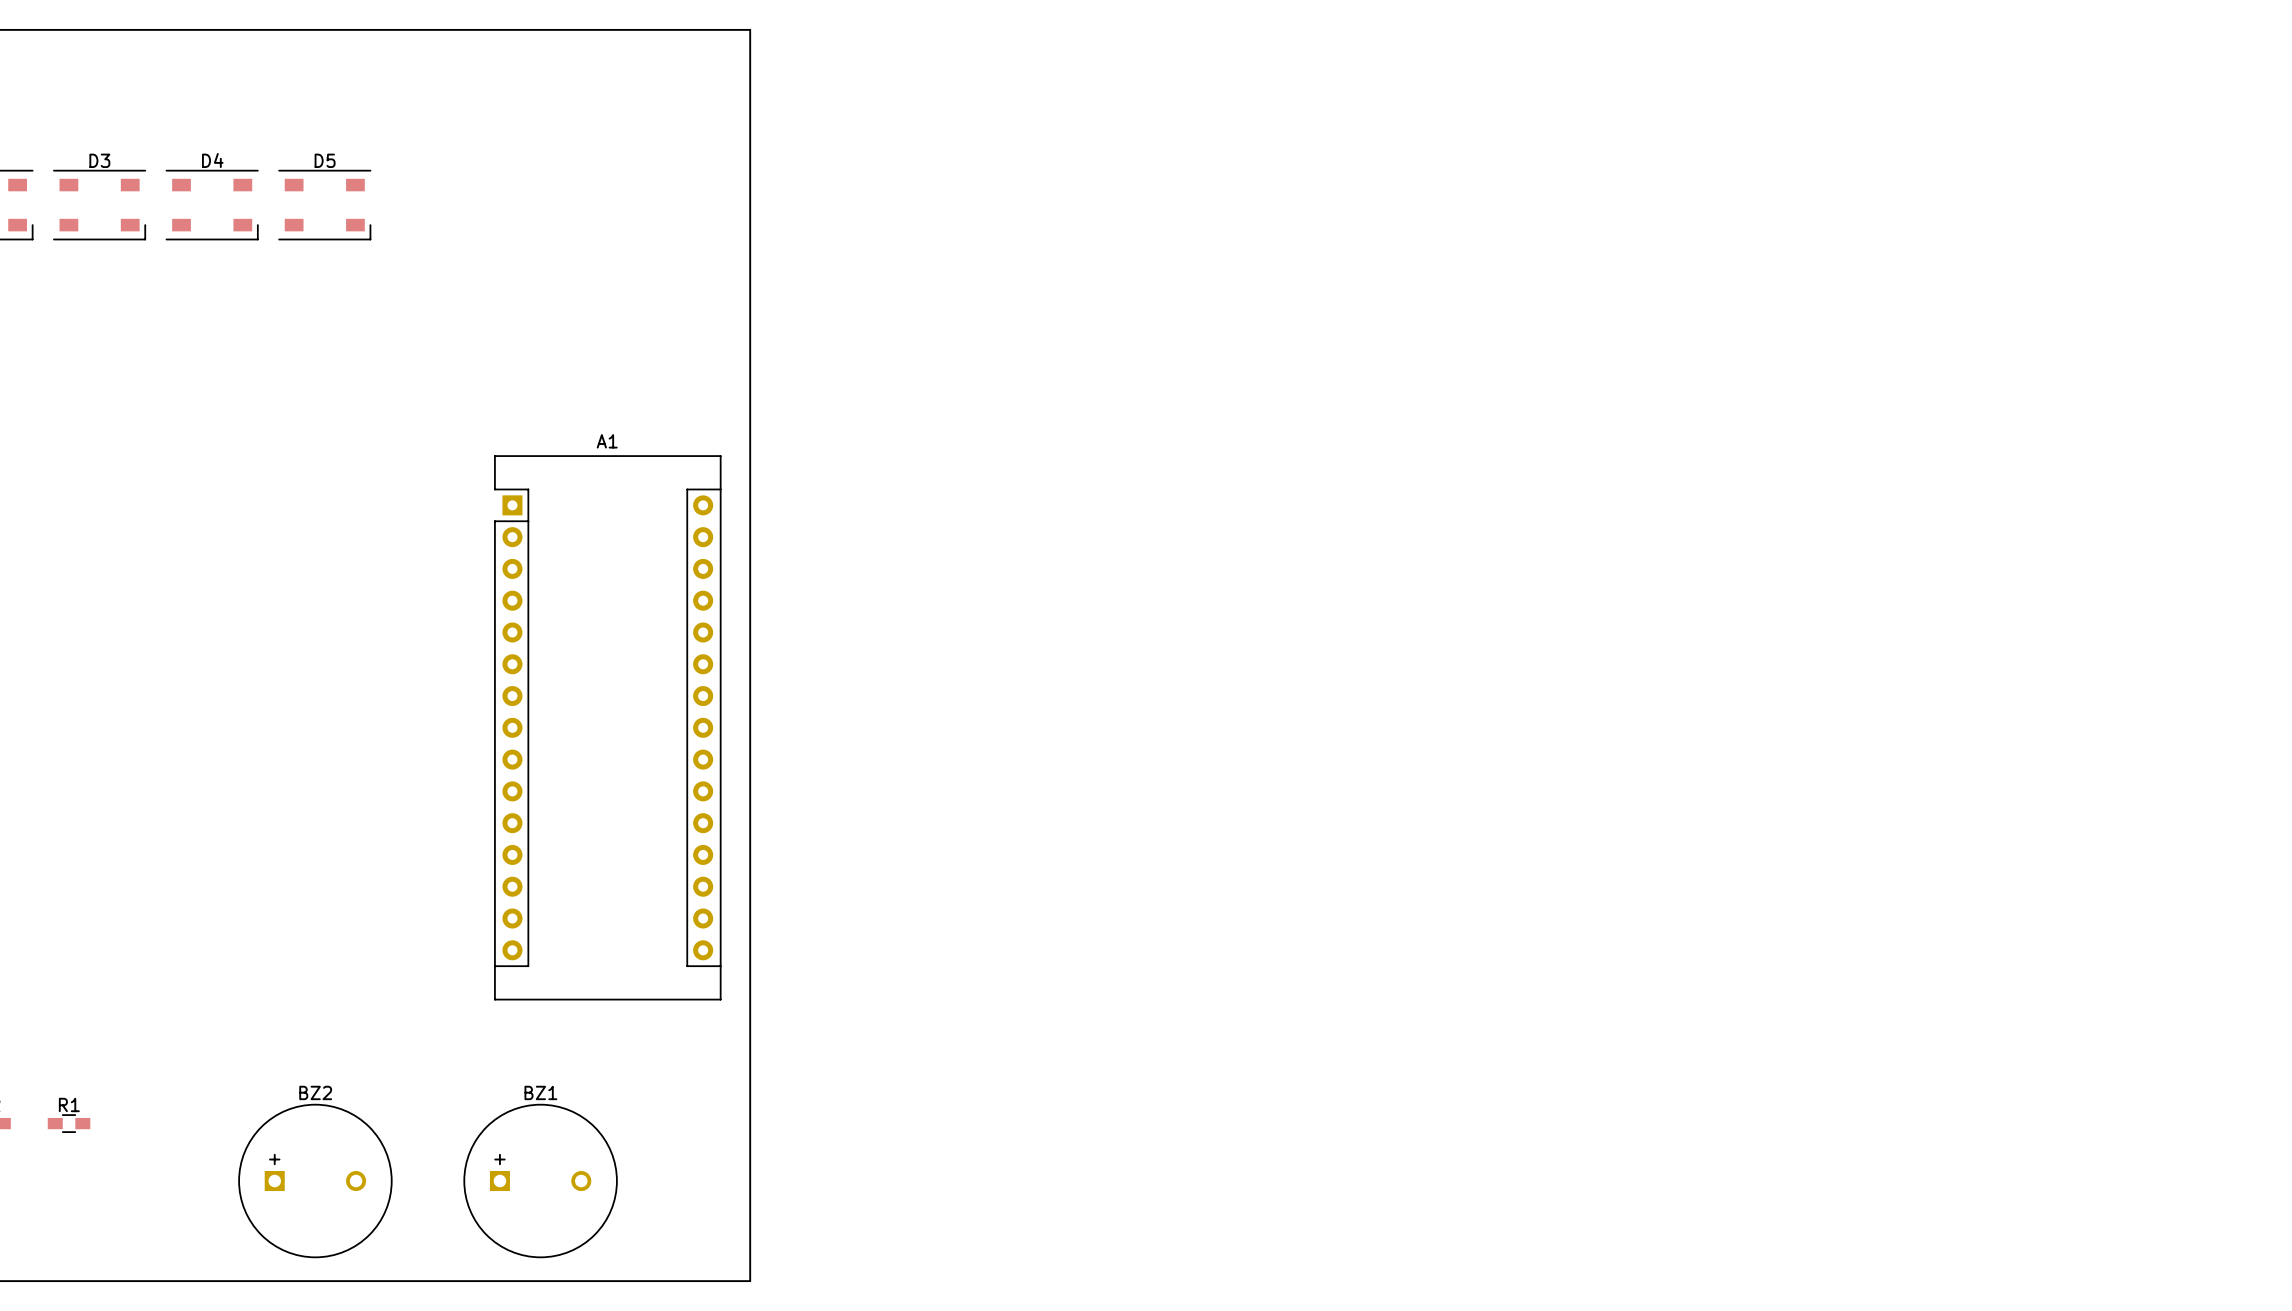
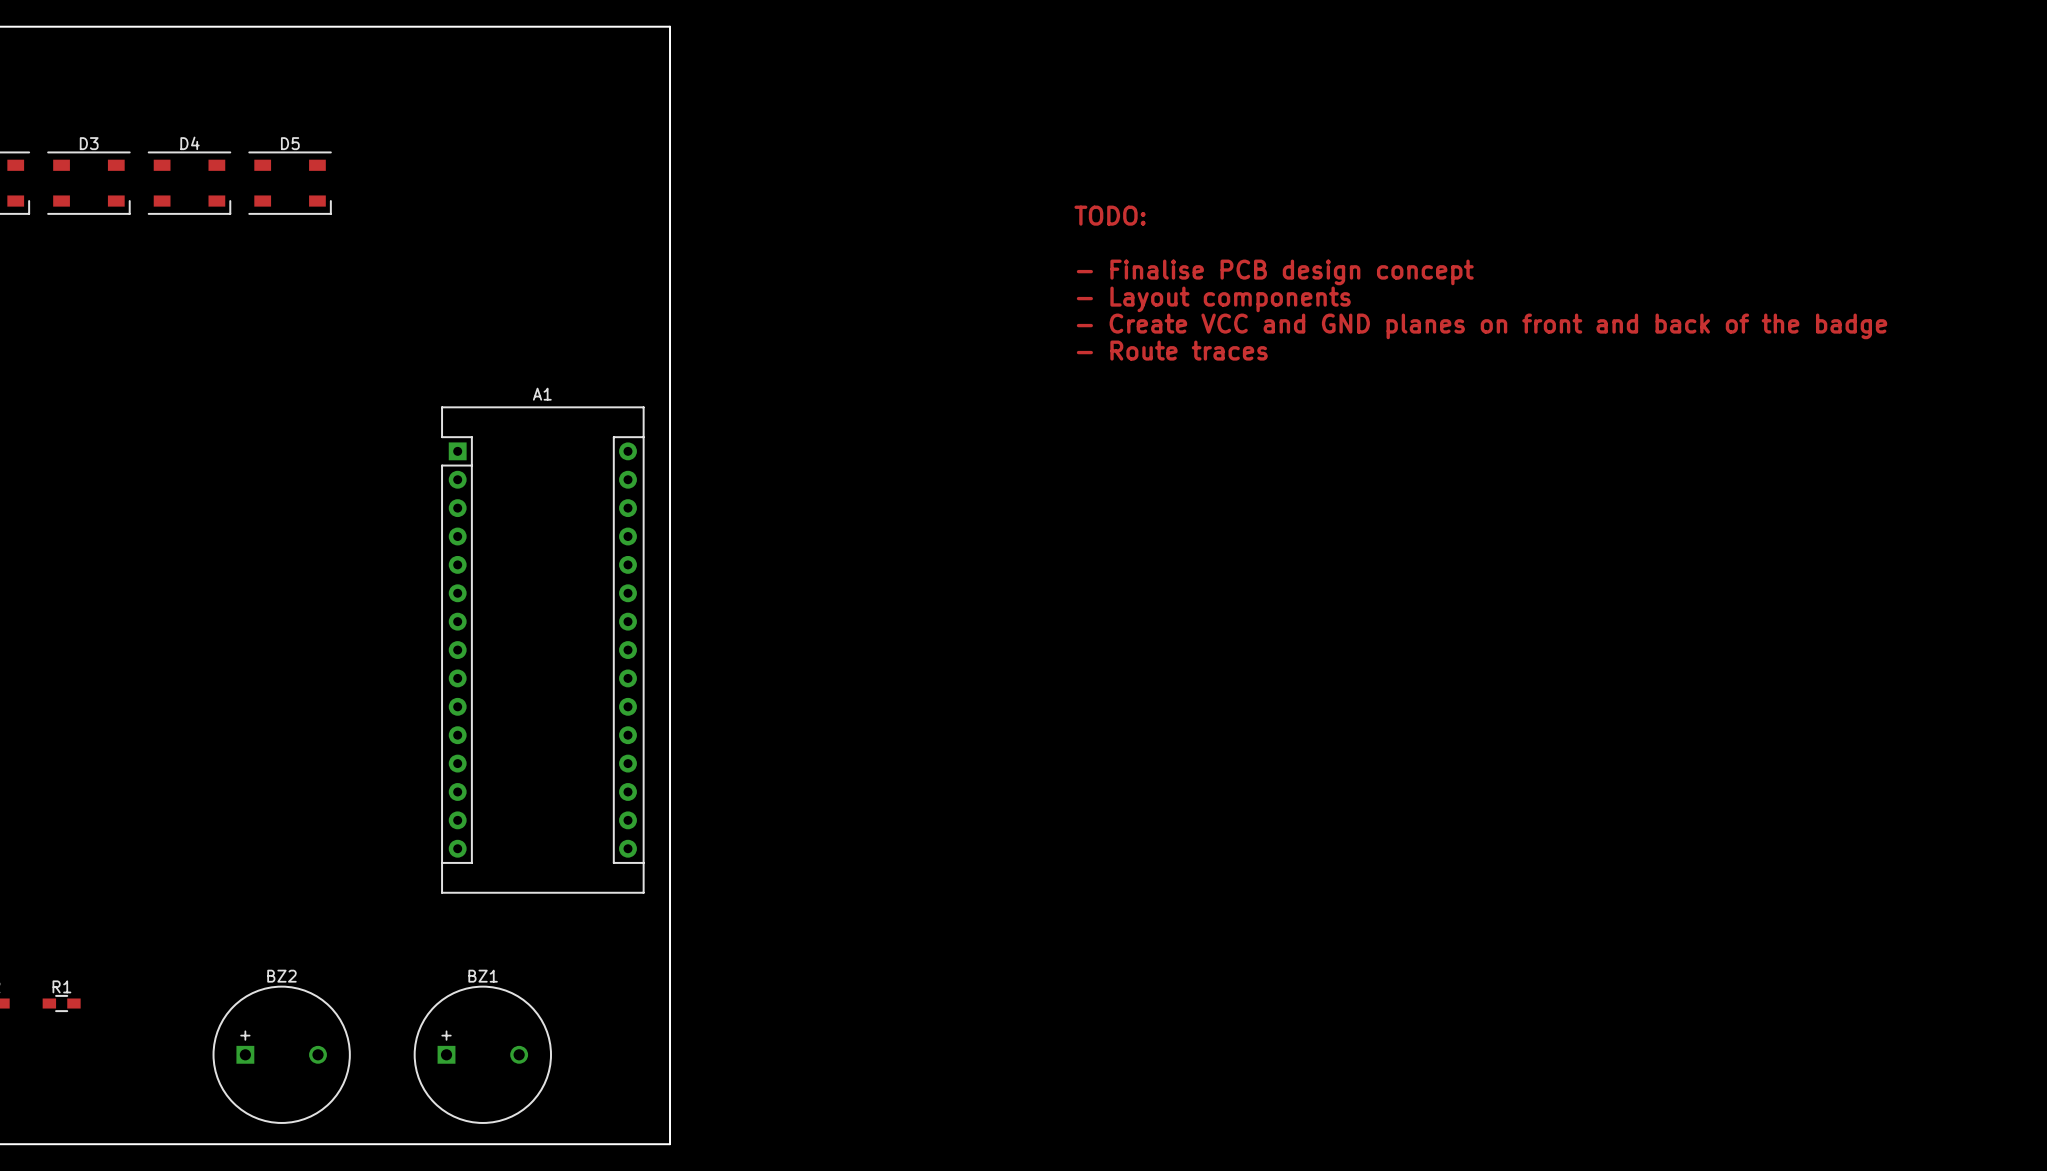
text: none -> TODO: (1110, 215)
text: none -> - Finalise PCB design concept (1275, 272)
text: none -> - Layout components (1213, 299)
text: none -> - Create VCC and GND planes on front and back of the badge (1482, 326)
text: none -> - Route traces (1172, 350)

